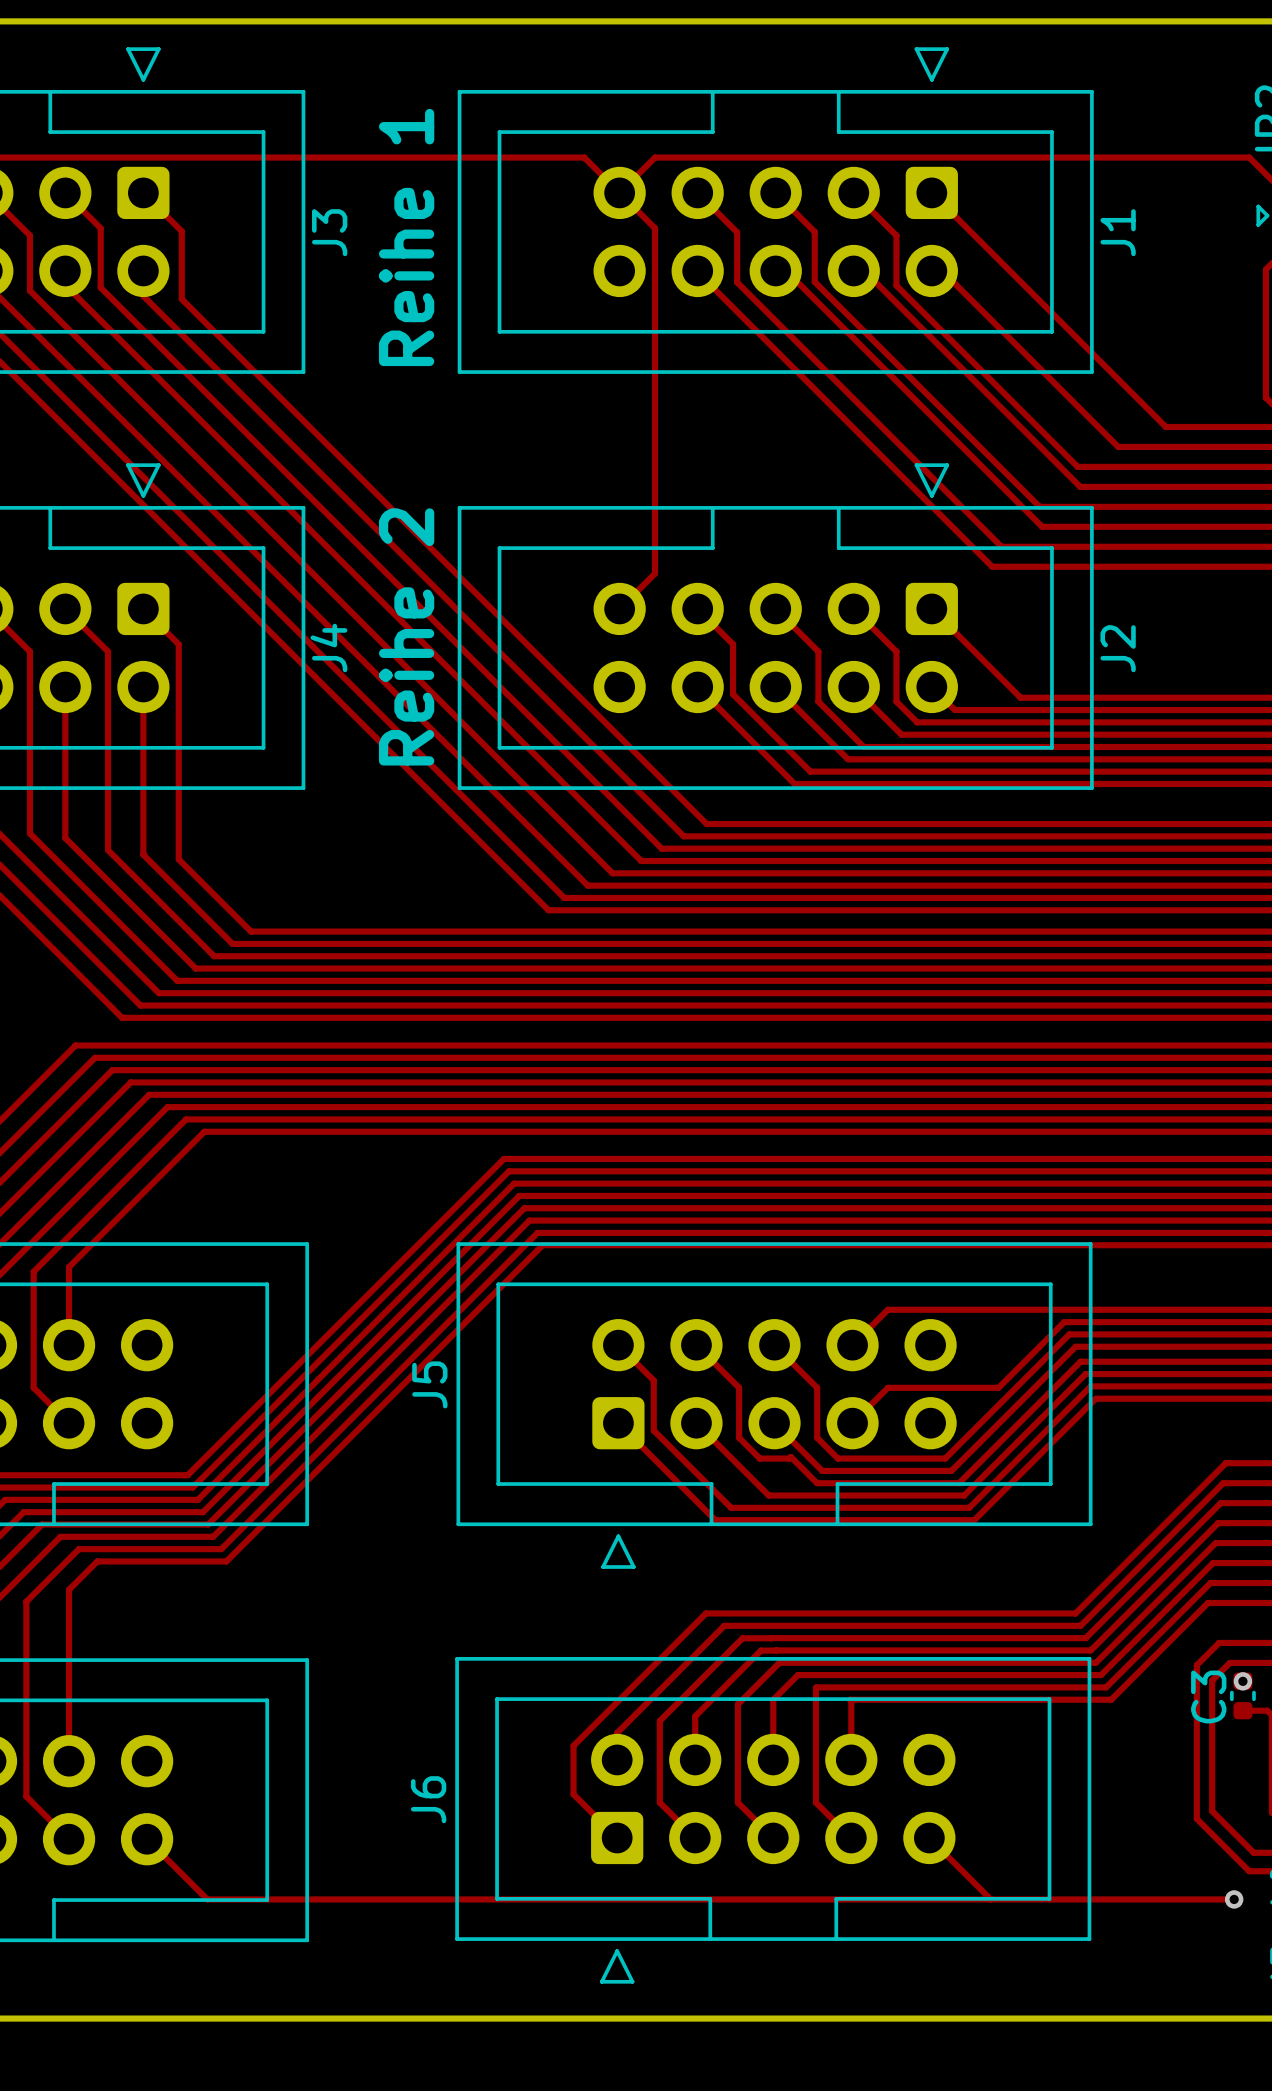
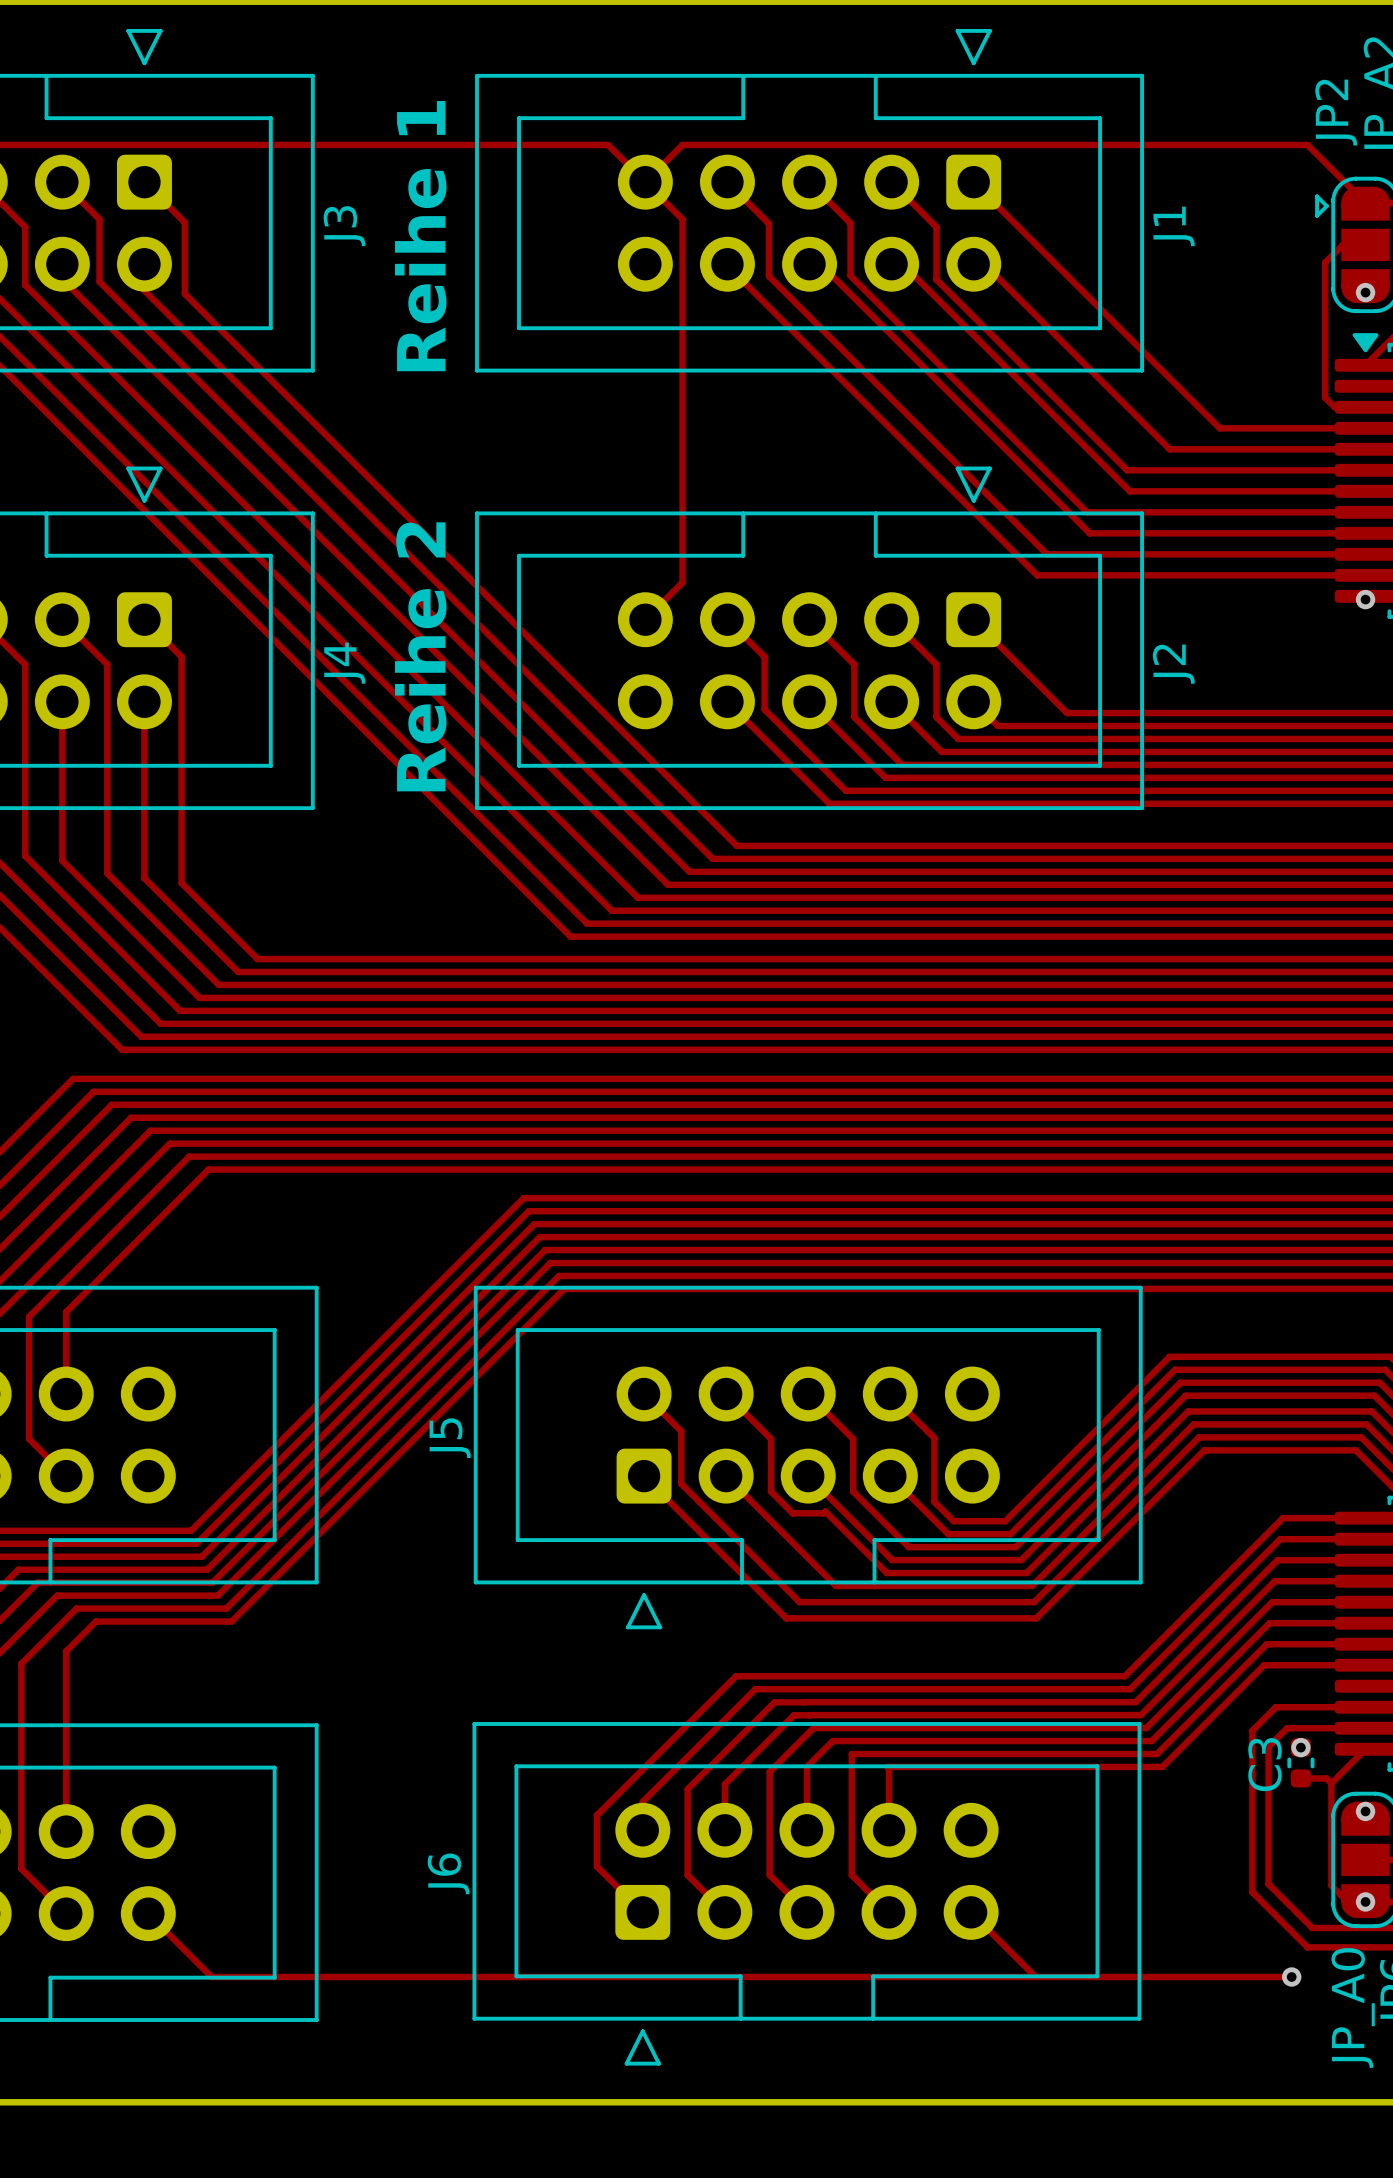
track: (1118, 1309) (887, 1309) (852, 1345) -> (1169, 1356) (1005, 1521) (953, 1521) (934, 1501) (934, 1438) (890, 1394) (890, 1414)
track: (1123, 1322) (1064, 1322) (998, 1387) (887, 1387) (852, 1423) -> (1174, 1369) (1010, 1534) (948, 1534) (890, 1476)
track: (1128, 1334) (1069, 1334) (945, 1458) (837, 1458) -> (1180, 1382) (1015, 1547) (908, 1547) (874, 1513)
track: (1133, 1346) (1075, 1346) (951, 1470) (822, 1470) -> (1185, 1395) (1021, 1560) (892, 1560) (858, 1526)
track: (1135, 1361) (1080, 1361) (959, 1483) (817, 1483) -> (1188, 1411) (1026, 1573) (886, 1573) (853, 1539)
track: (1140, 1374) (1085, 1374) (964, 1495) (768, 1495) -> (1193, 1424) (1032, 1586) (836, 1586) (802, 1552)
track: (1146, 1386) (1090, 1386) (969, 1507) (731, 1507) -> (1198, 1437) (1034, 1602) (799, 1602) (762, 1565)
track: (1151, 1398) (1095, 1398) (974, 1520) (715, 1520) -> (1204, 1450) (1036, 1618) (786, 1618) (746, 1578)

